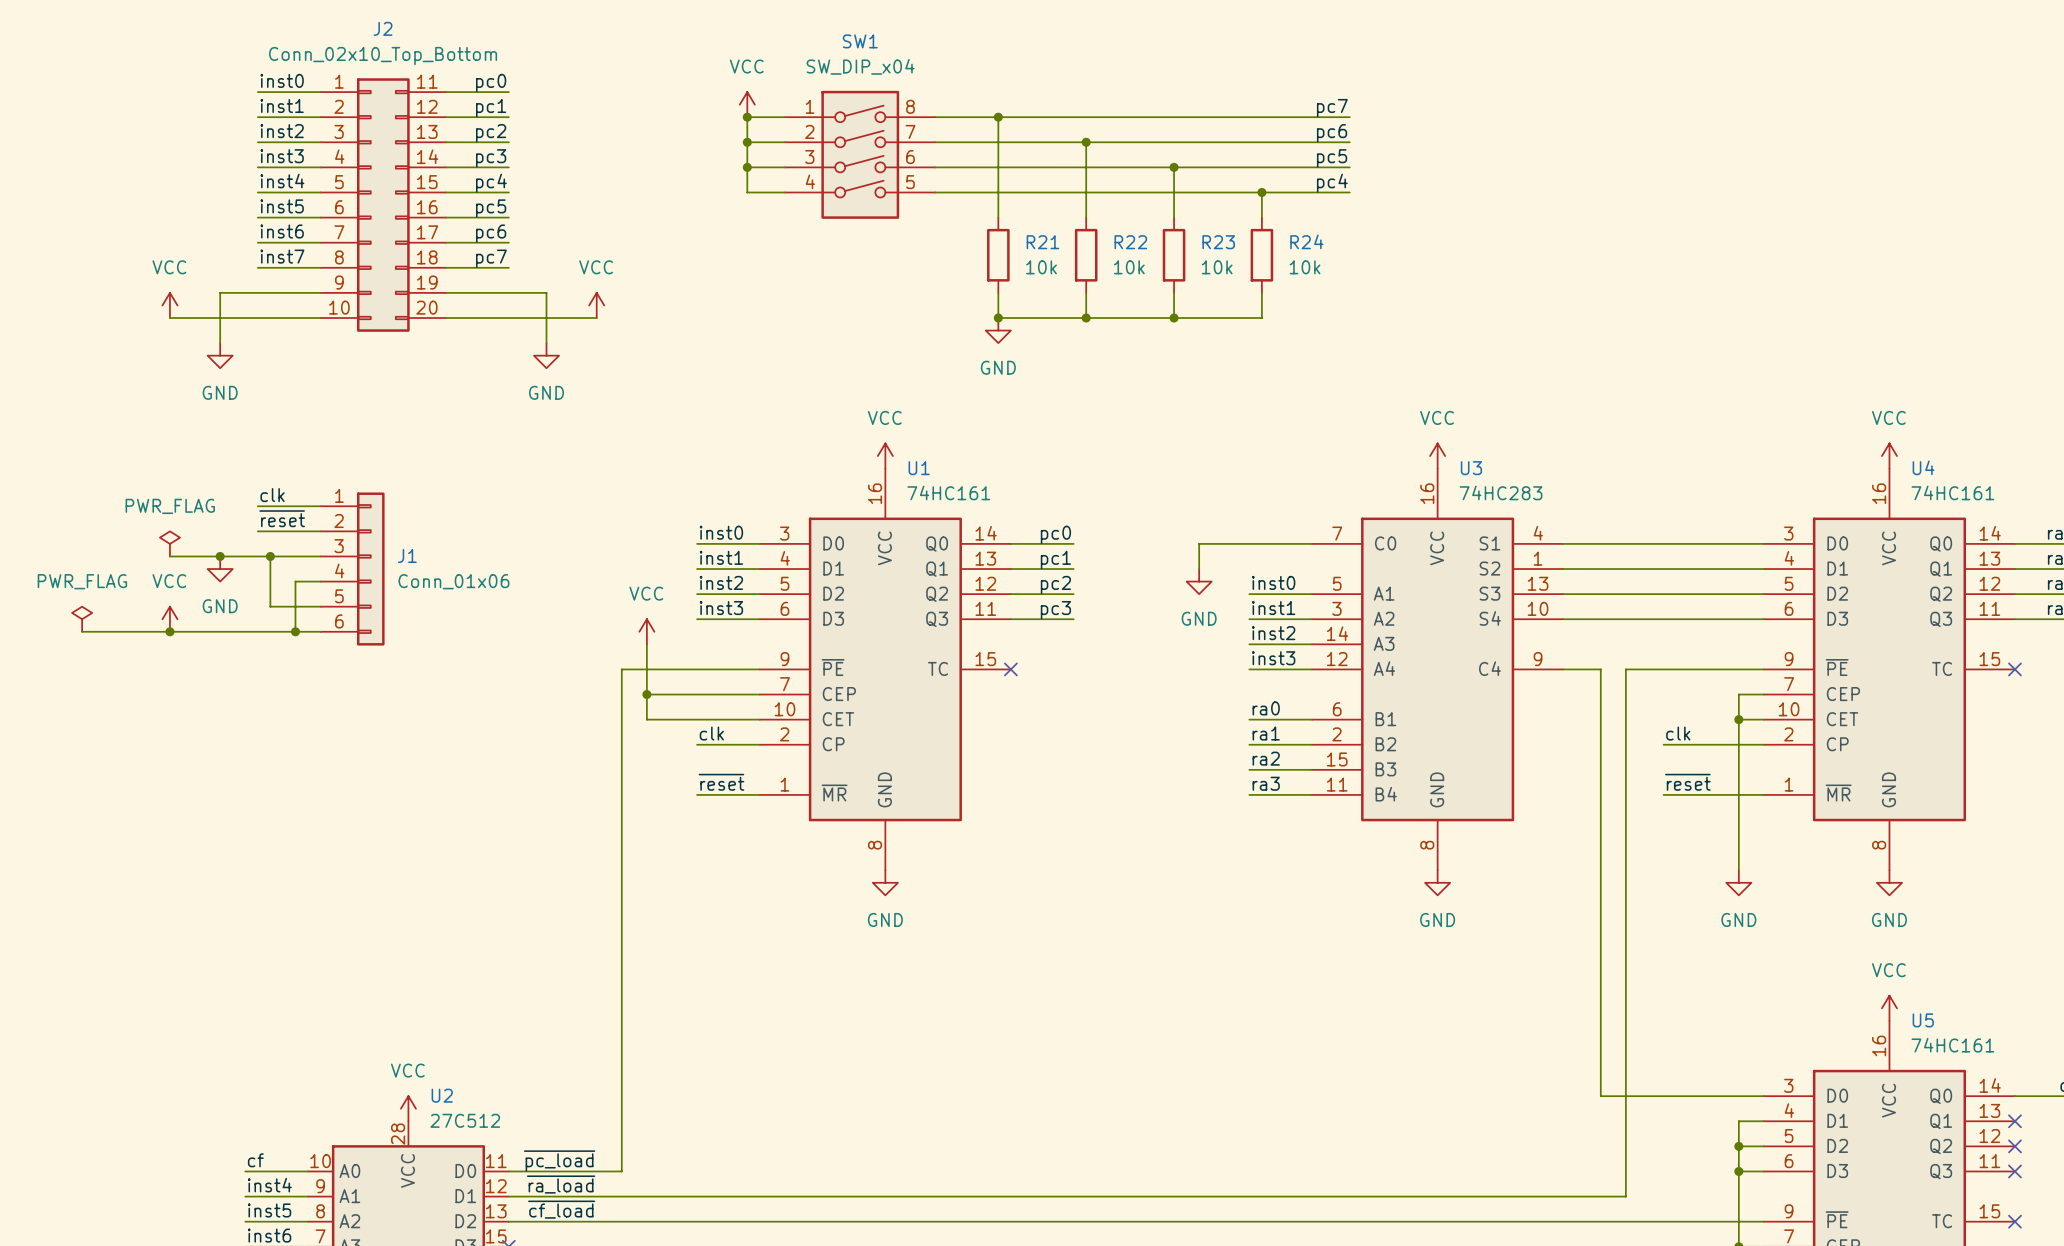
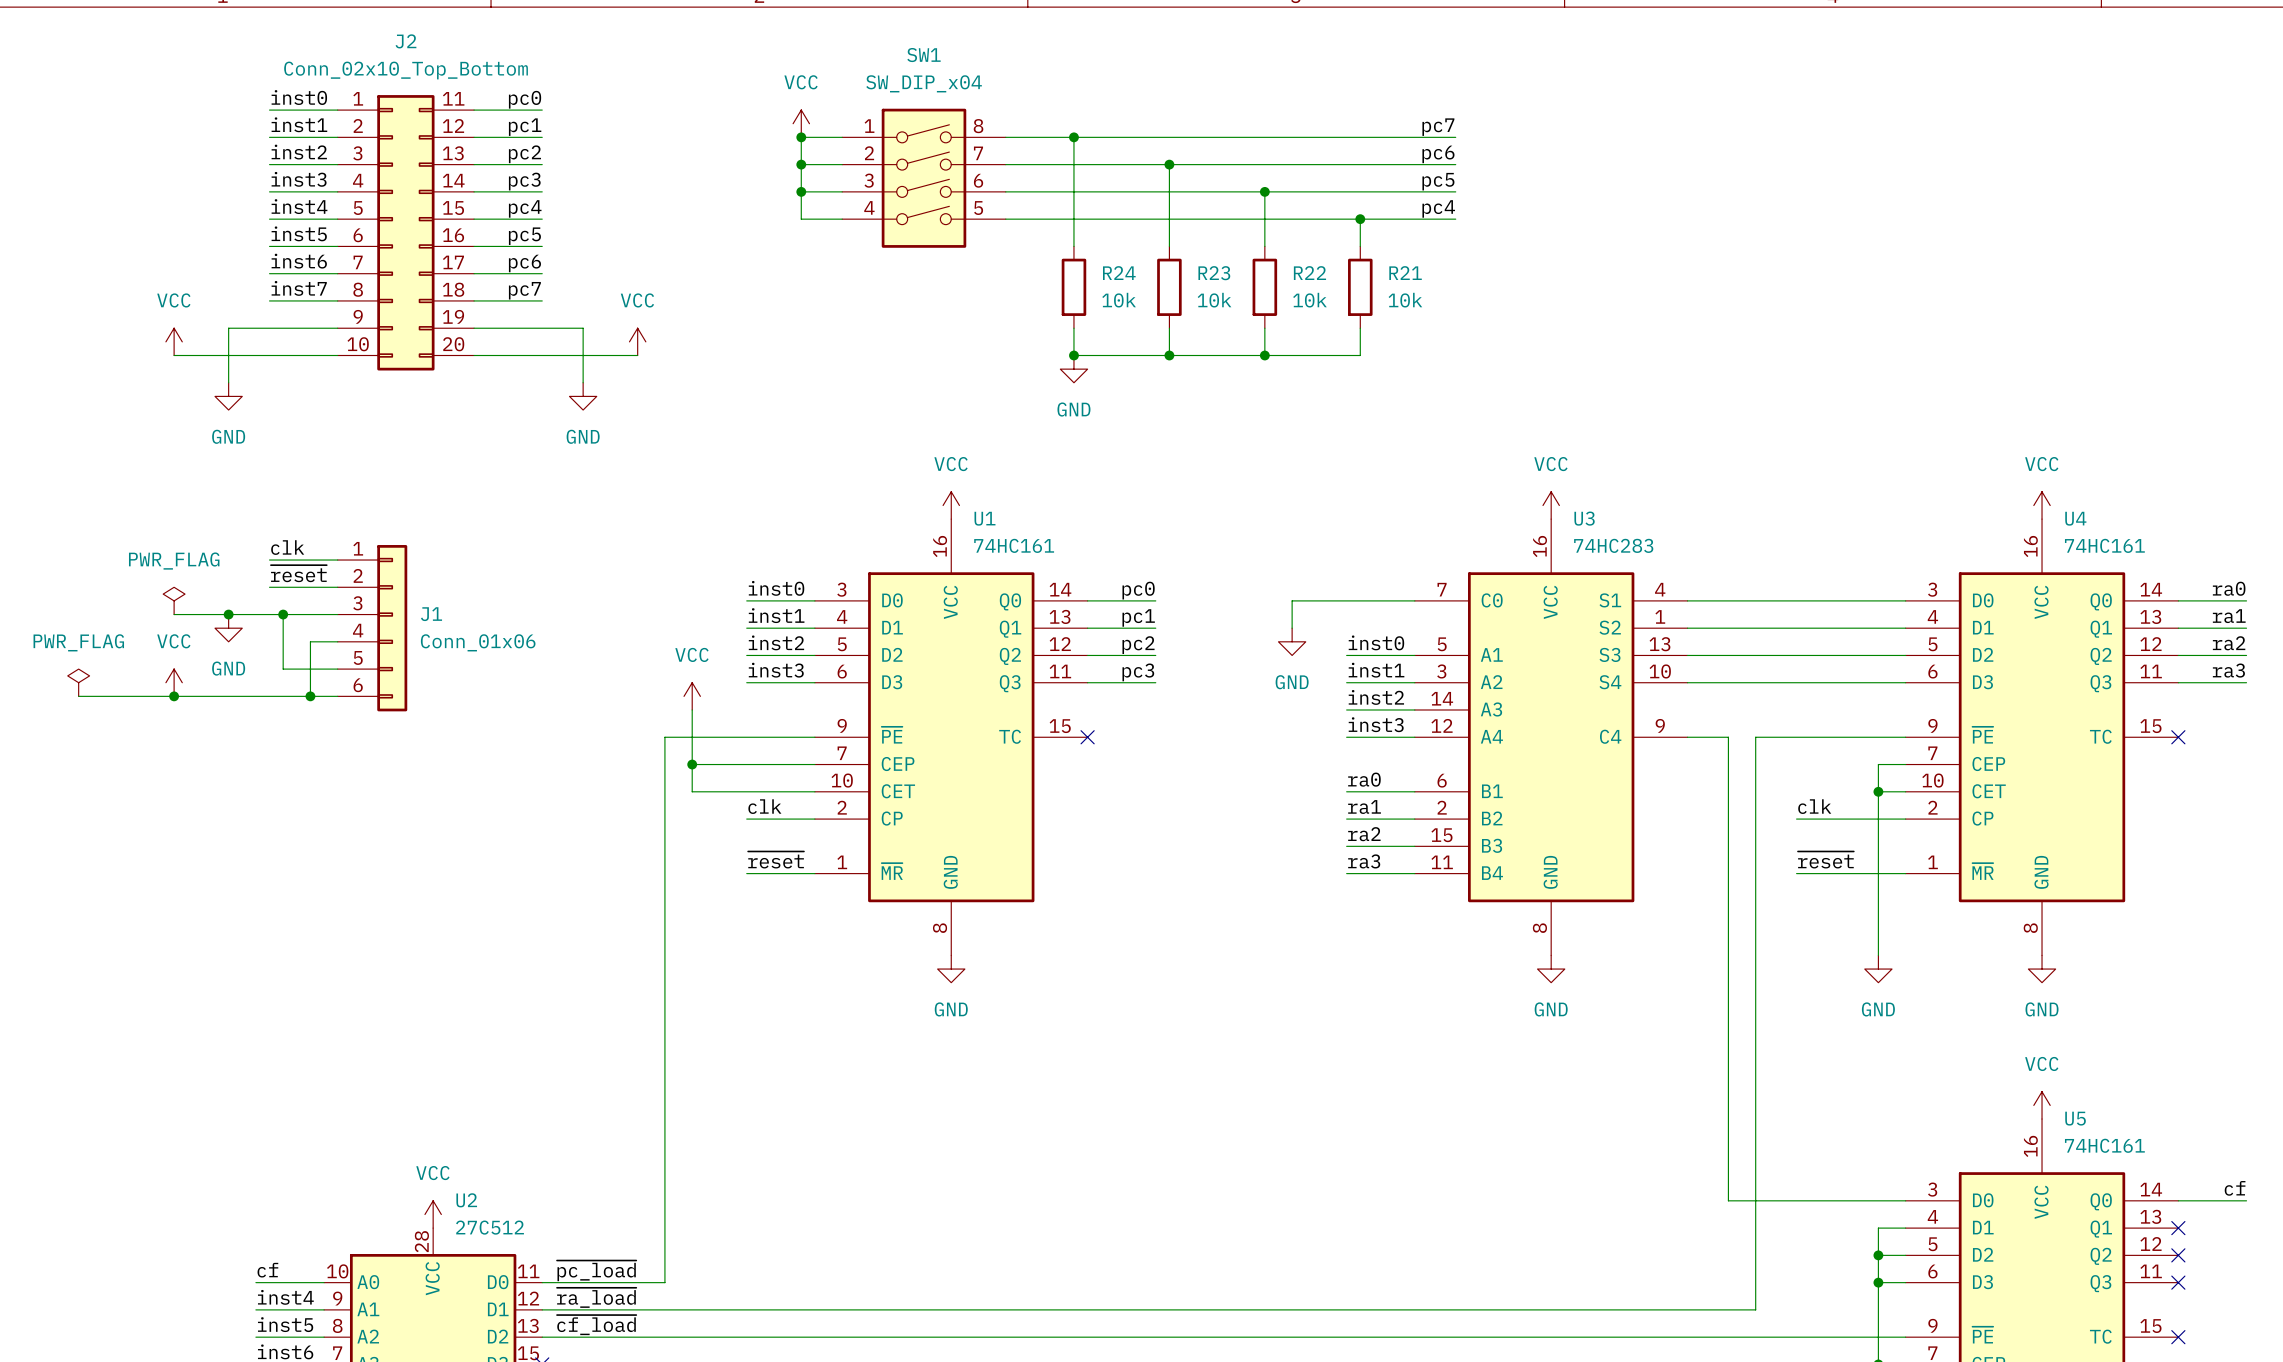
R24 name: R24 (1306, 241) -> R21 (1405, 273)
R21 name: R21 (1042, 242) -> R24 (1119, 273)
R22 name: R22 (1130, 242) -> R23 (1214, 273)
R23 name: R23 (1218, 242) -> R22 (1309, 273)

